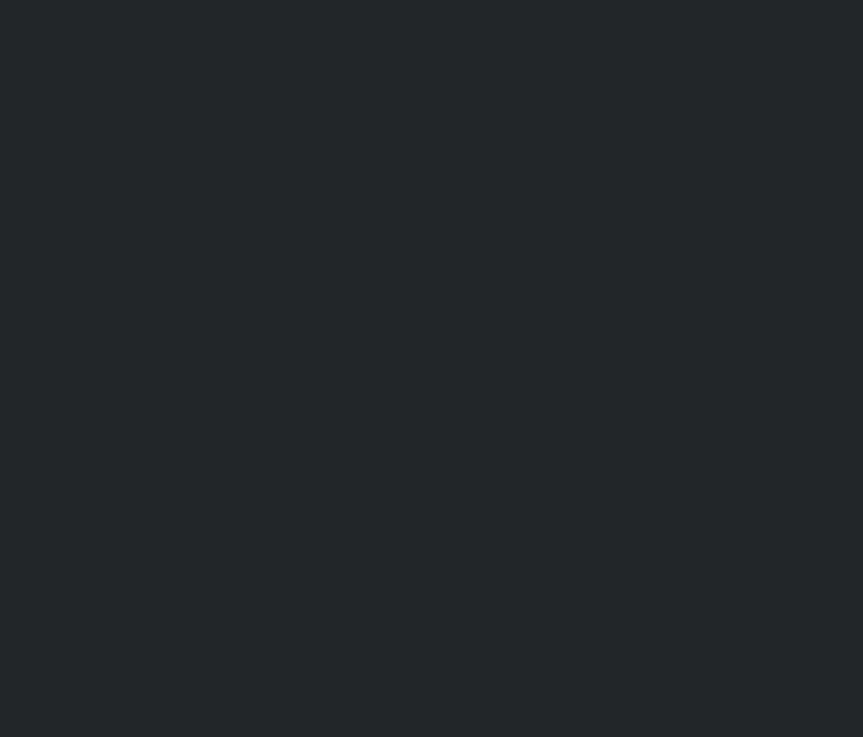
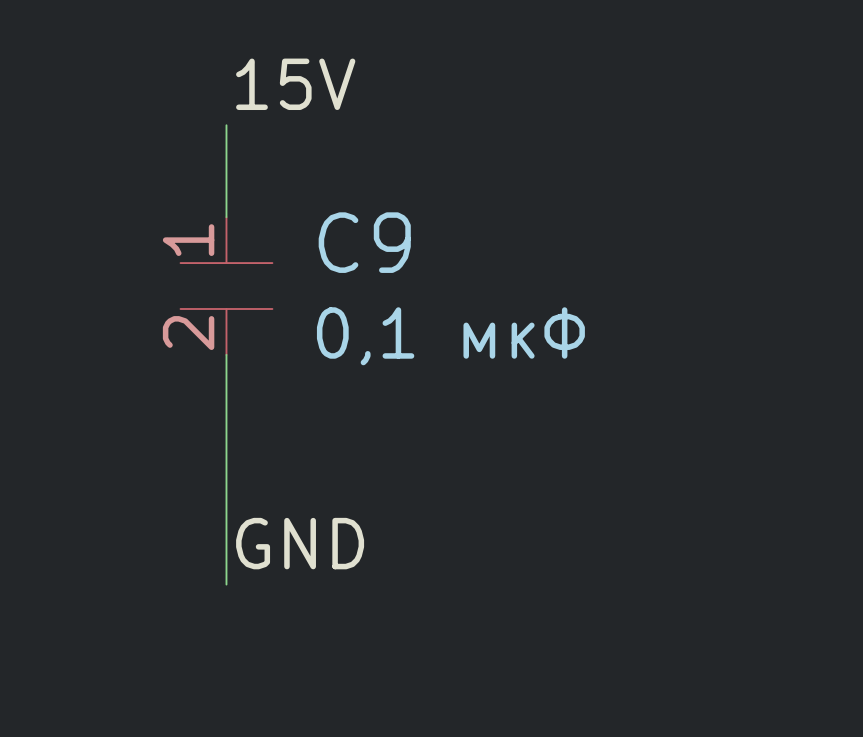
label: none -> 15V (295, 84)
wire: none -> (226, 125) (226, 217)
C9: none -> (226, 286)
wire: none -> (226, 354) (226, 584)
label: none -> GND (300, 543)

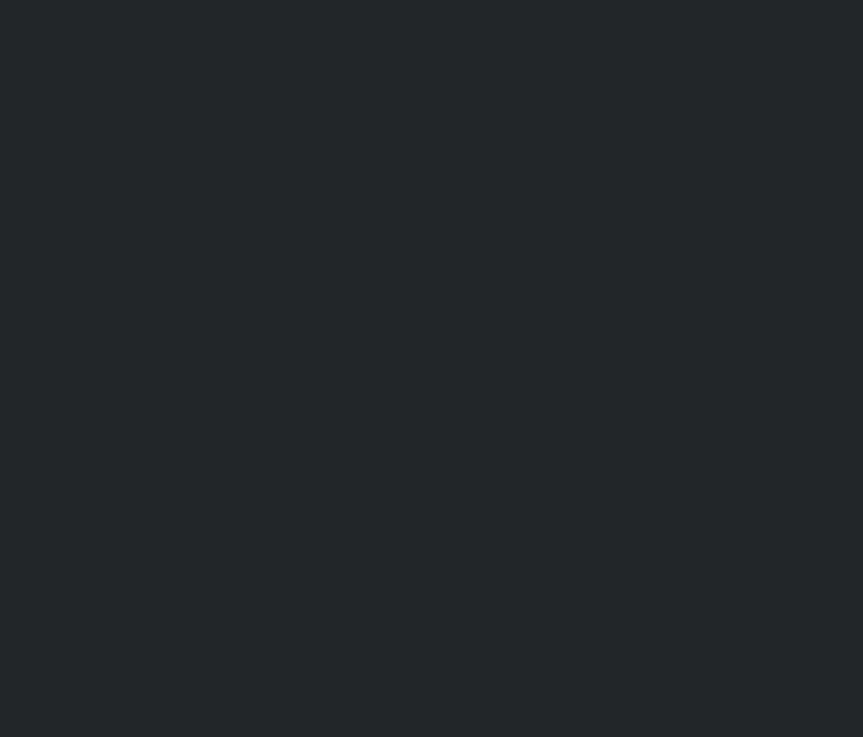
label: 15V (295, 84) -> none
wire: (226, 125) (226, 217) -> none
C9: (226, 286) -> none
wire: (226, 354) (226, 584) -> none
label: GND (300, 543) -> none

